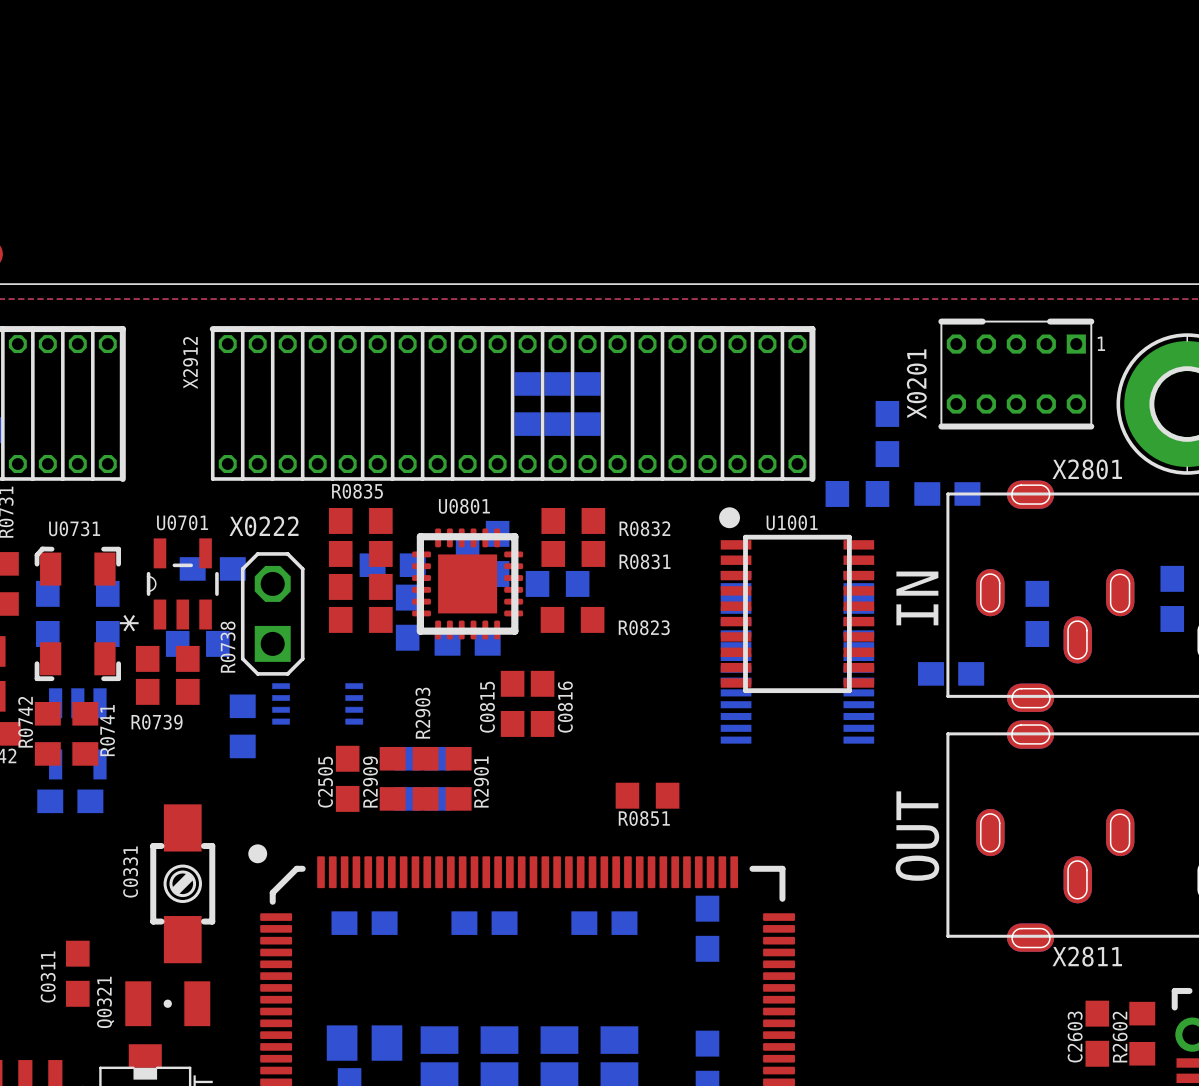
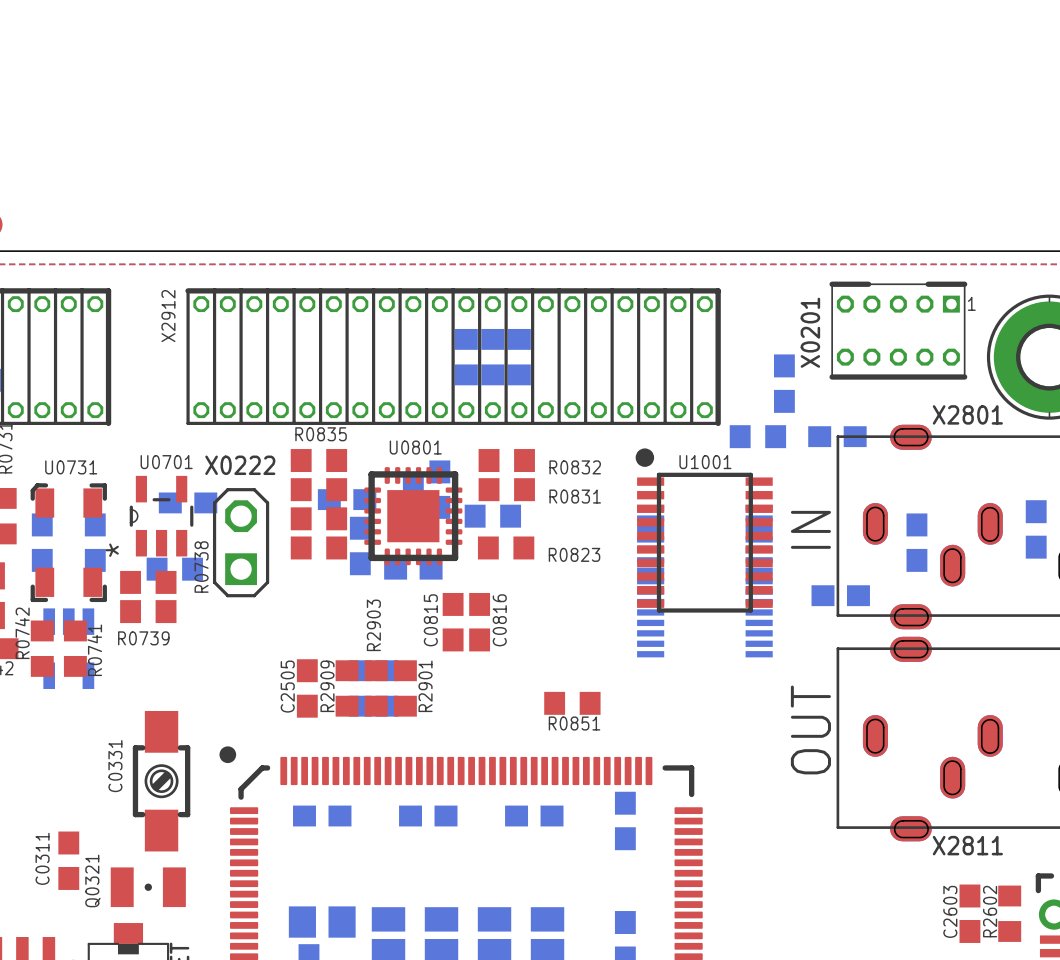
part: (317, 703) -> none
part: (242, 726) -> none
part: (70, 801) -> none

